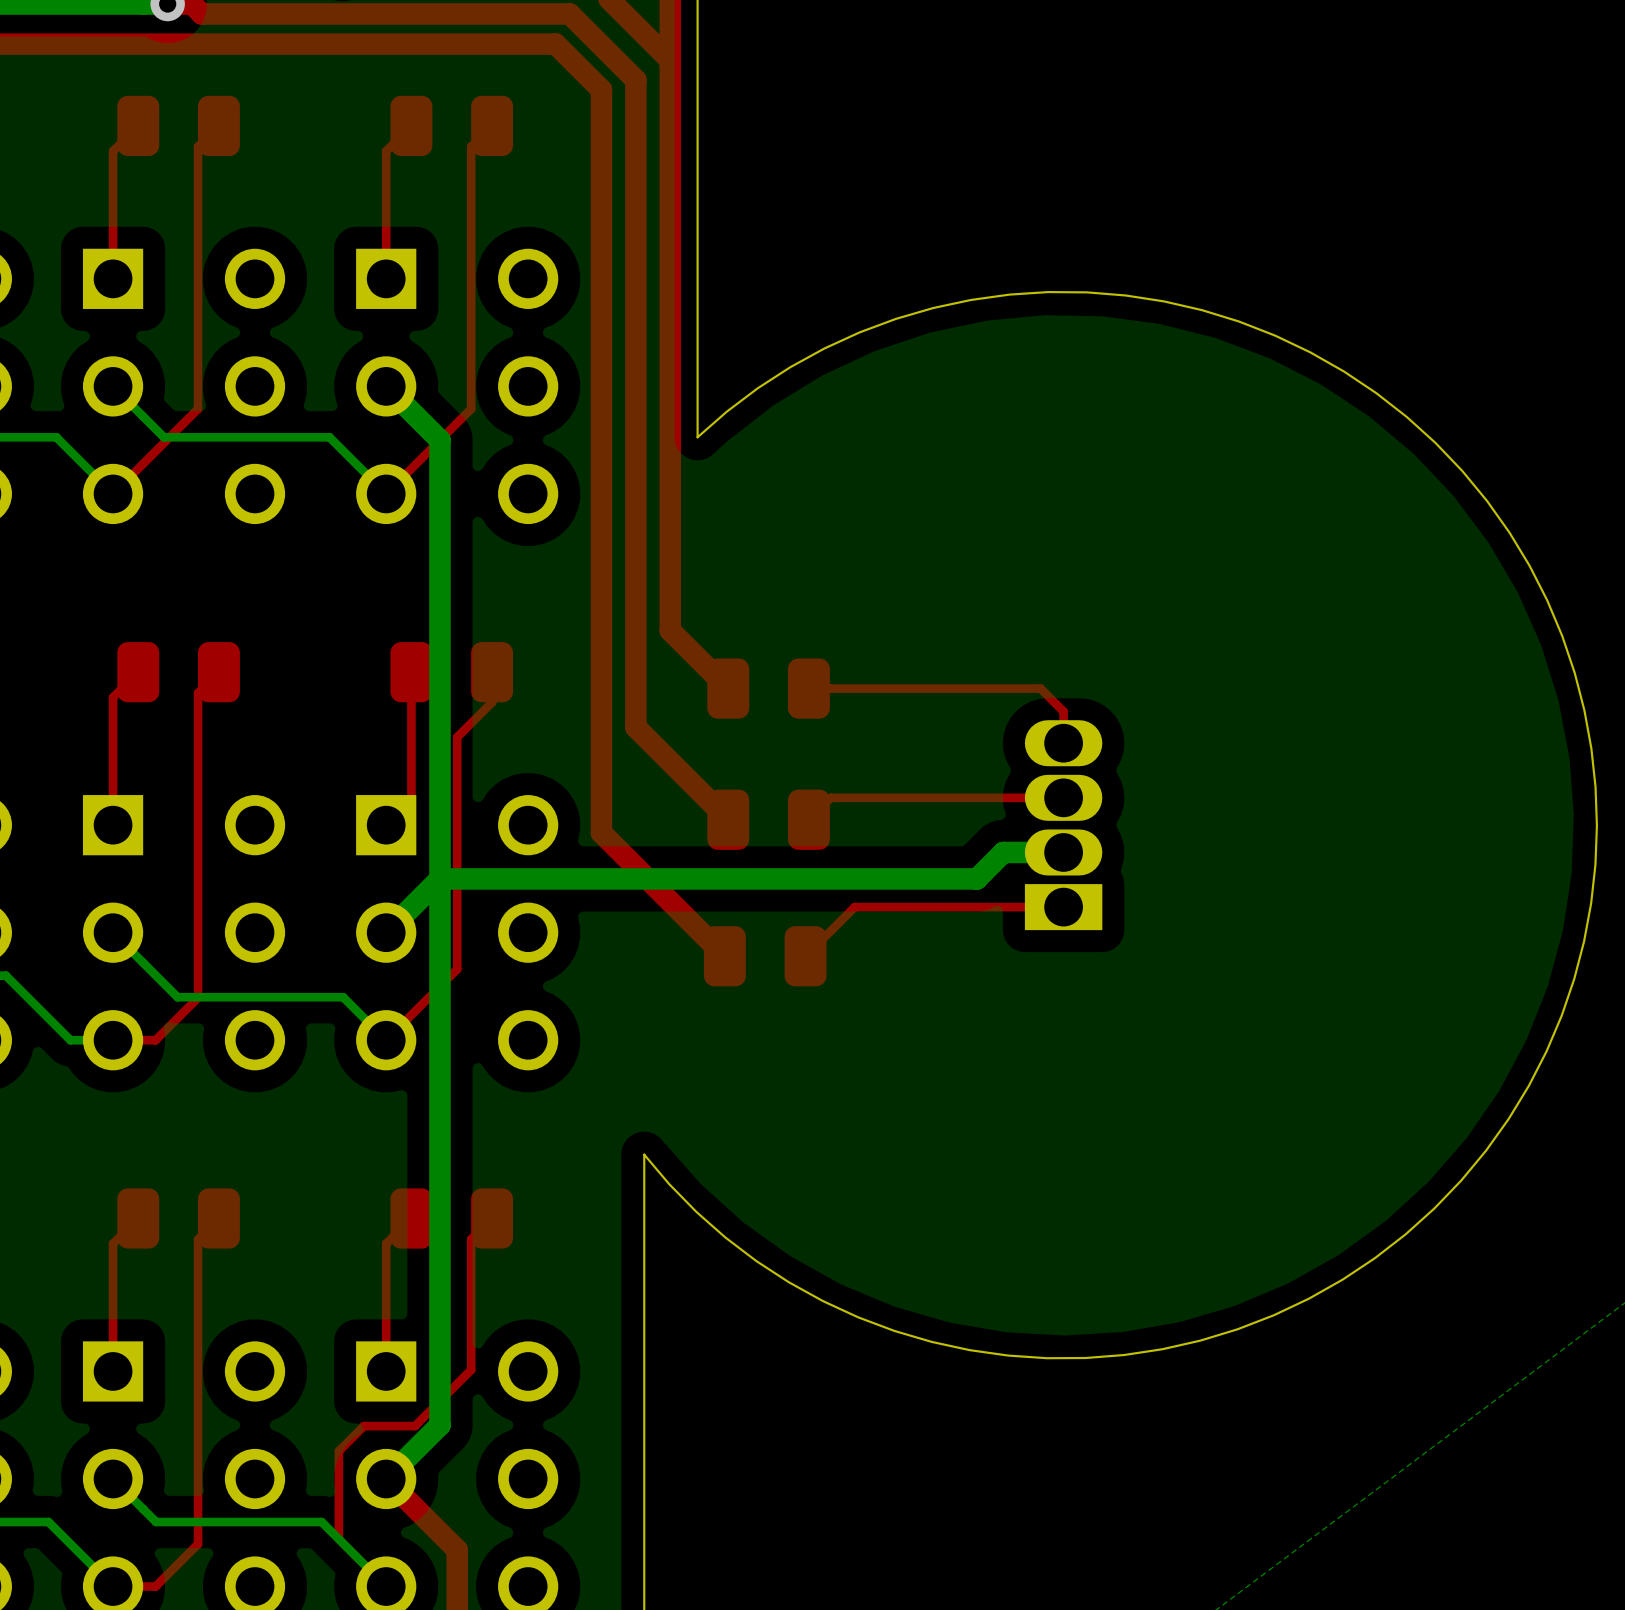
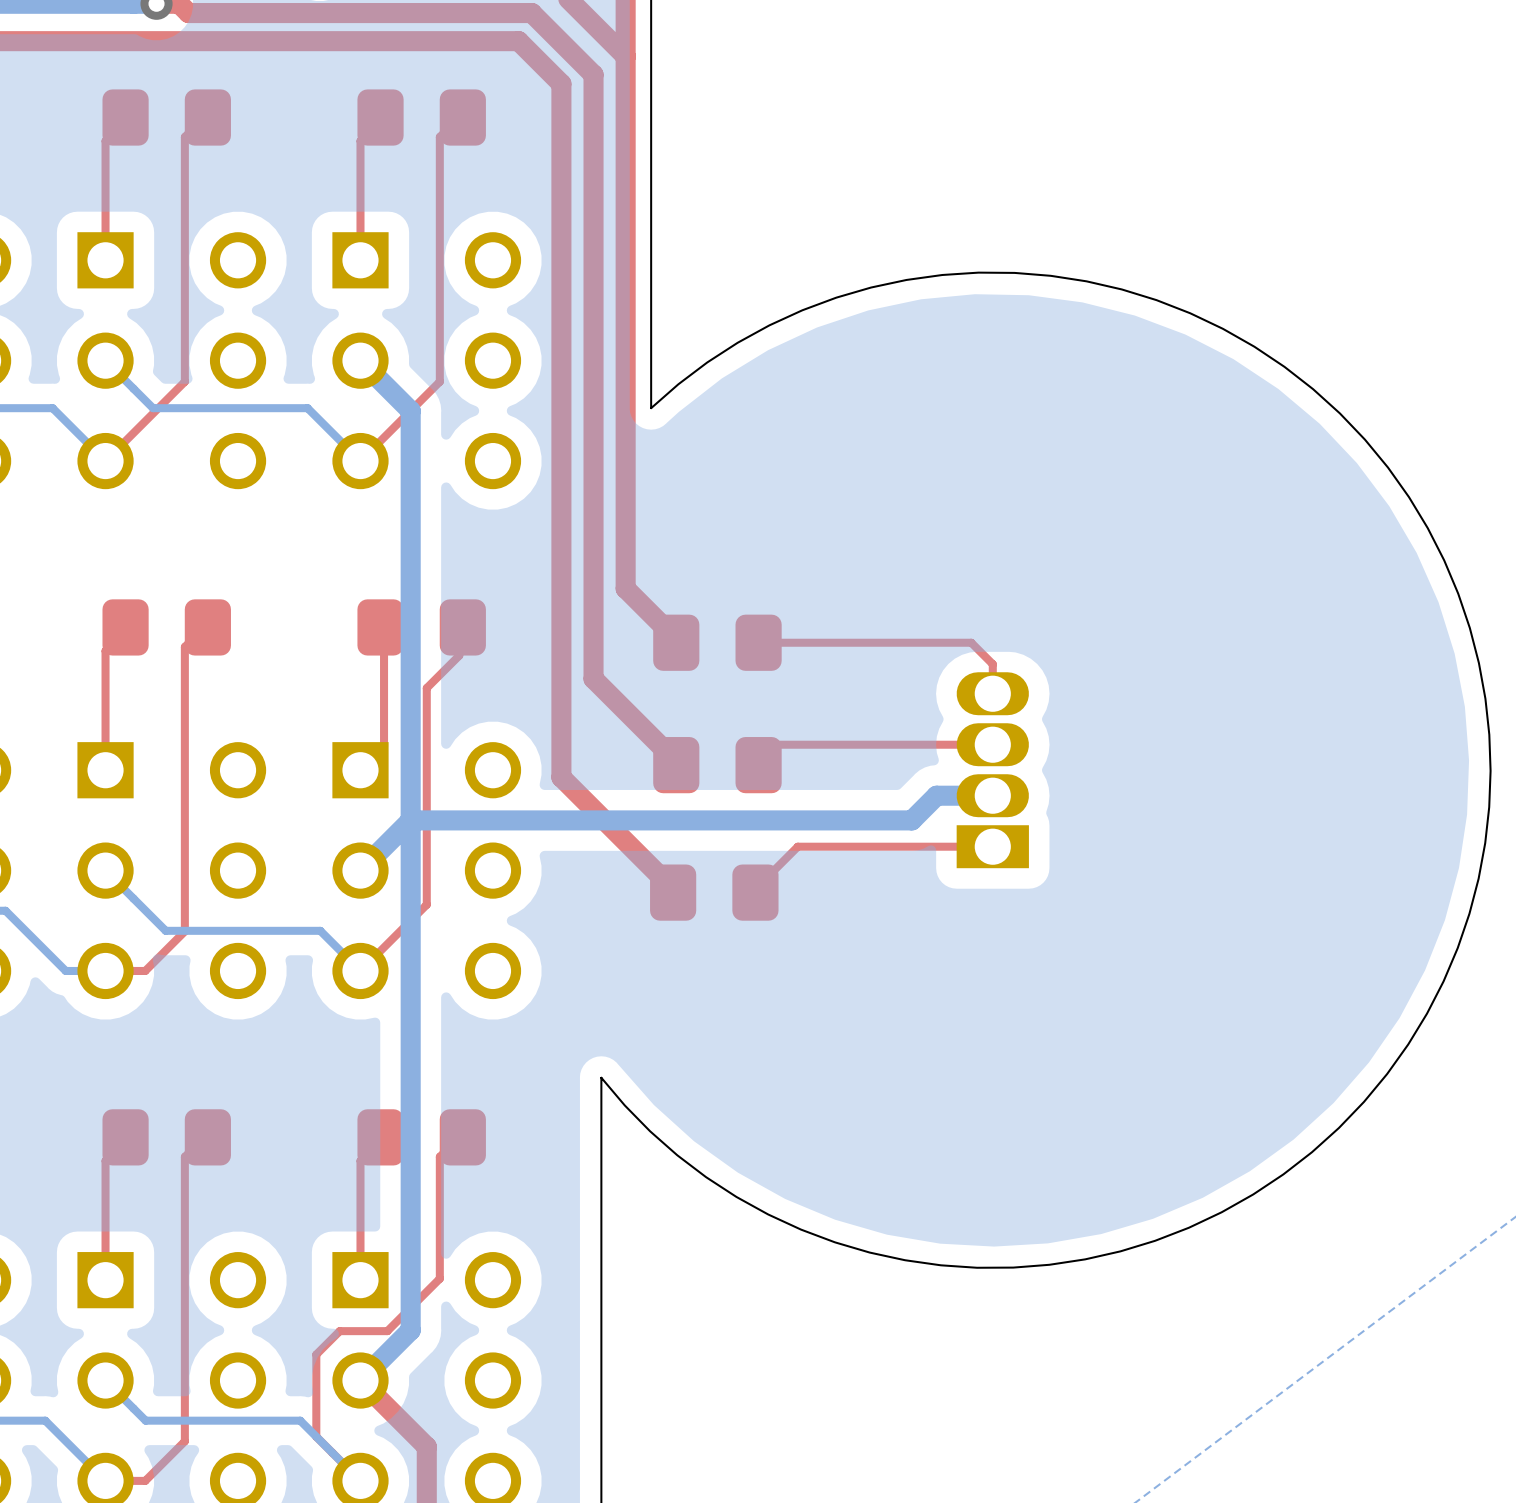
part footprint: [117, 95, 240, 157] -> [102, 89, 231, 146]
part footprint: [390, 95, 514, 157] -> [357, 89, 486, 146]
part footprint: [117, 642, 240, 703] -> [102, 599, 231, 656]
part footprint: [390, 642, 514, 703] -> [357, 599, 486, 656]
part footprint: [707, 658, 830, 719] -> [653, 614, 782, 671]
part footprint: [707, 789, 830, 850] -> [653, 737, 782, 794]
part footprint: [703, 926, 827, 987] -> [650, 864, 779, 921]
part footprint: [117, 1188, 240, 1249] -> [102, 1109, 231, 1166]
part footprint: [390, 1188, 514, 1249] -> [357, 1109, 486, 1166]

